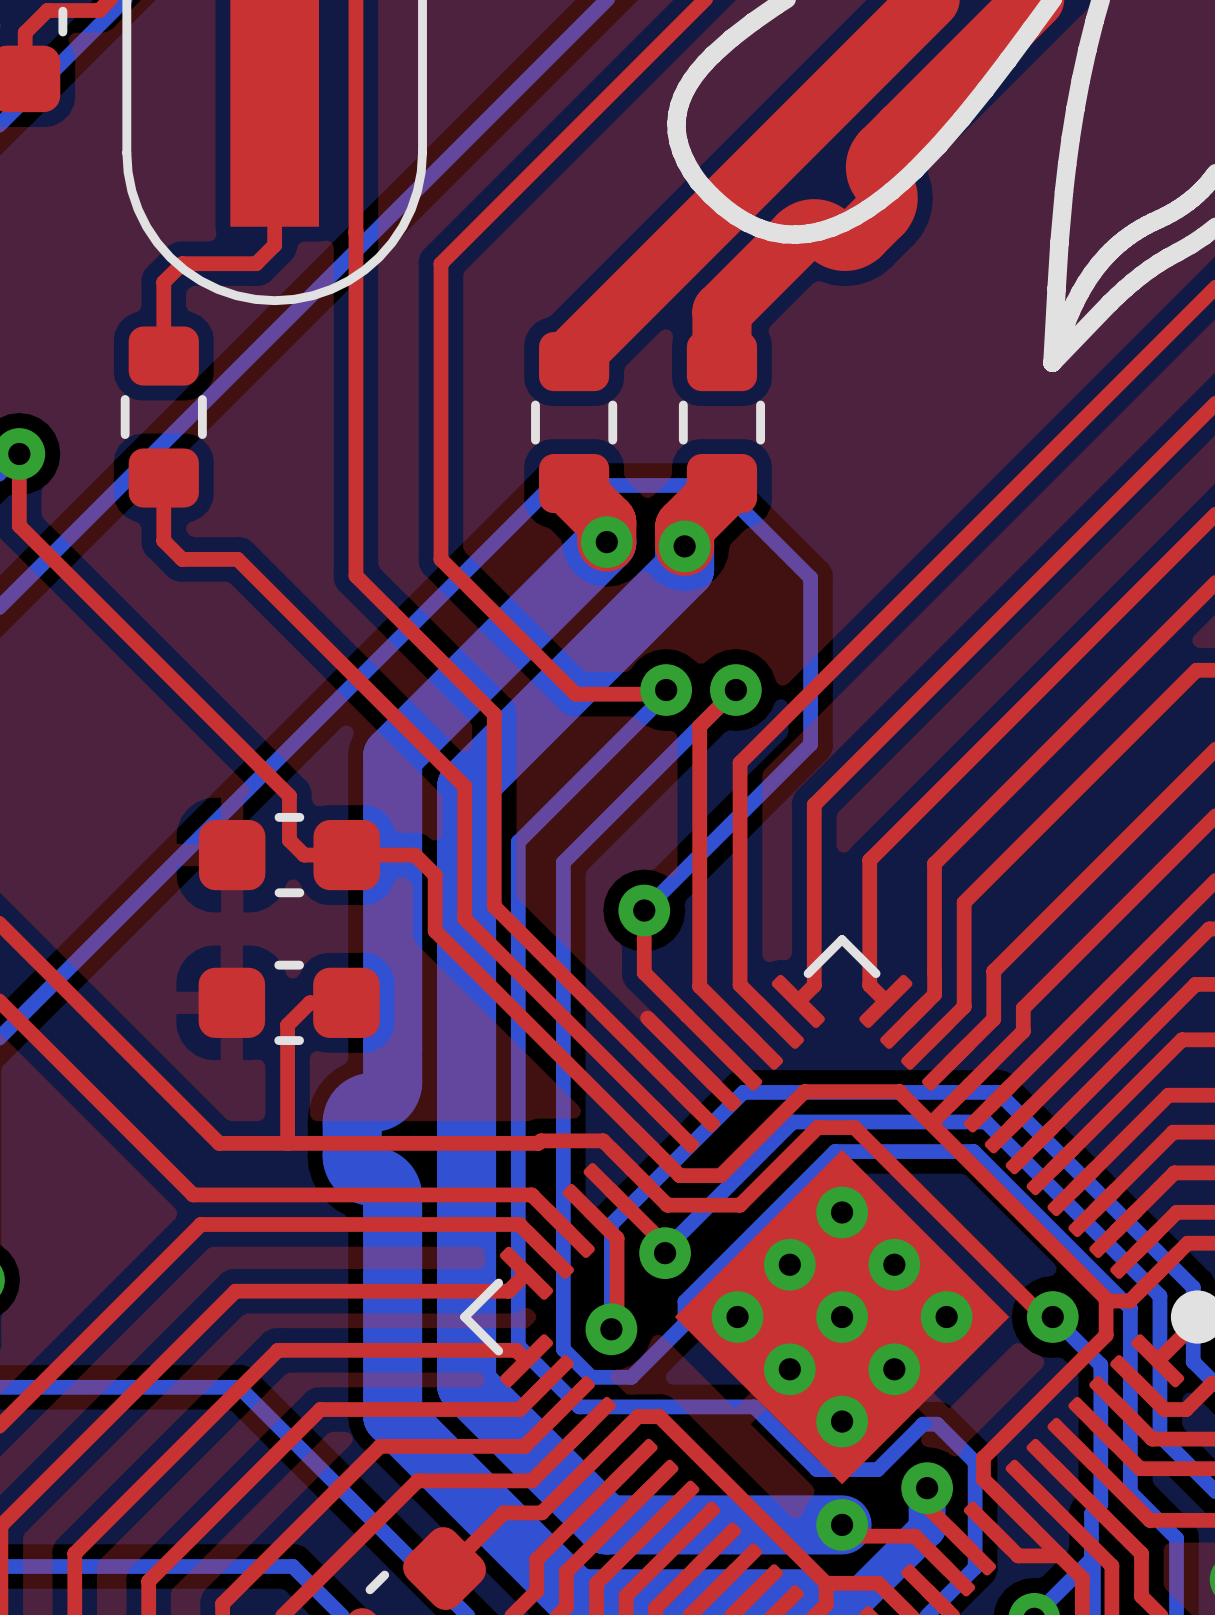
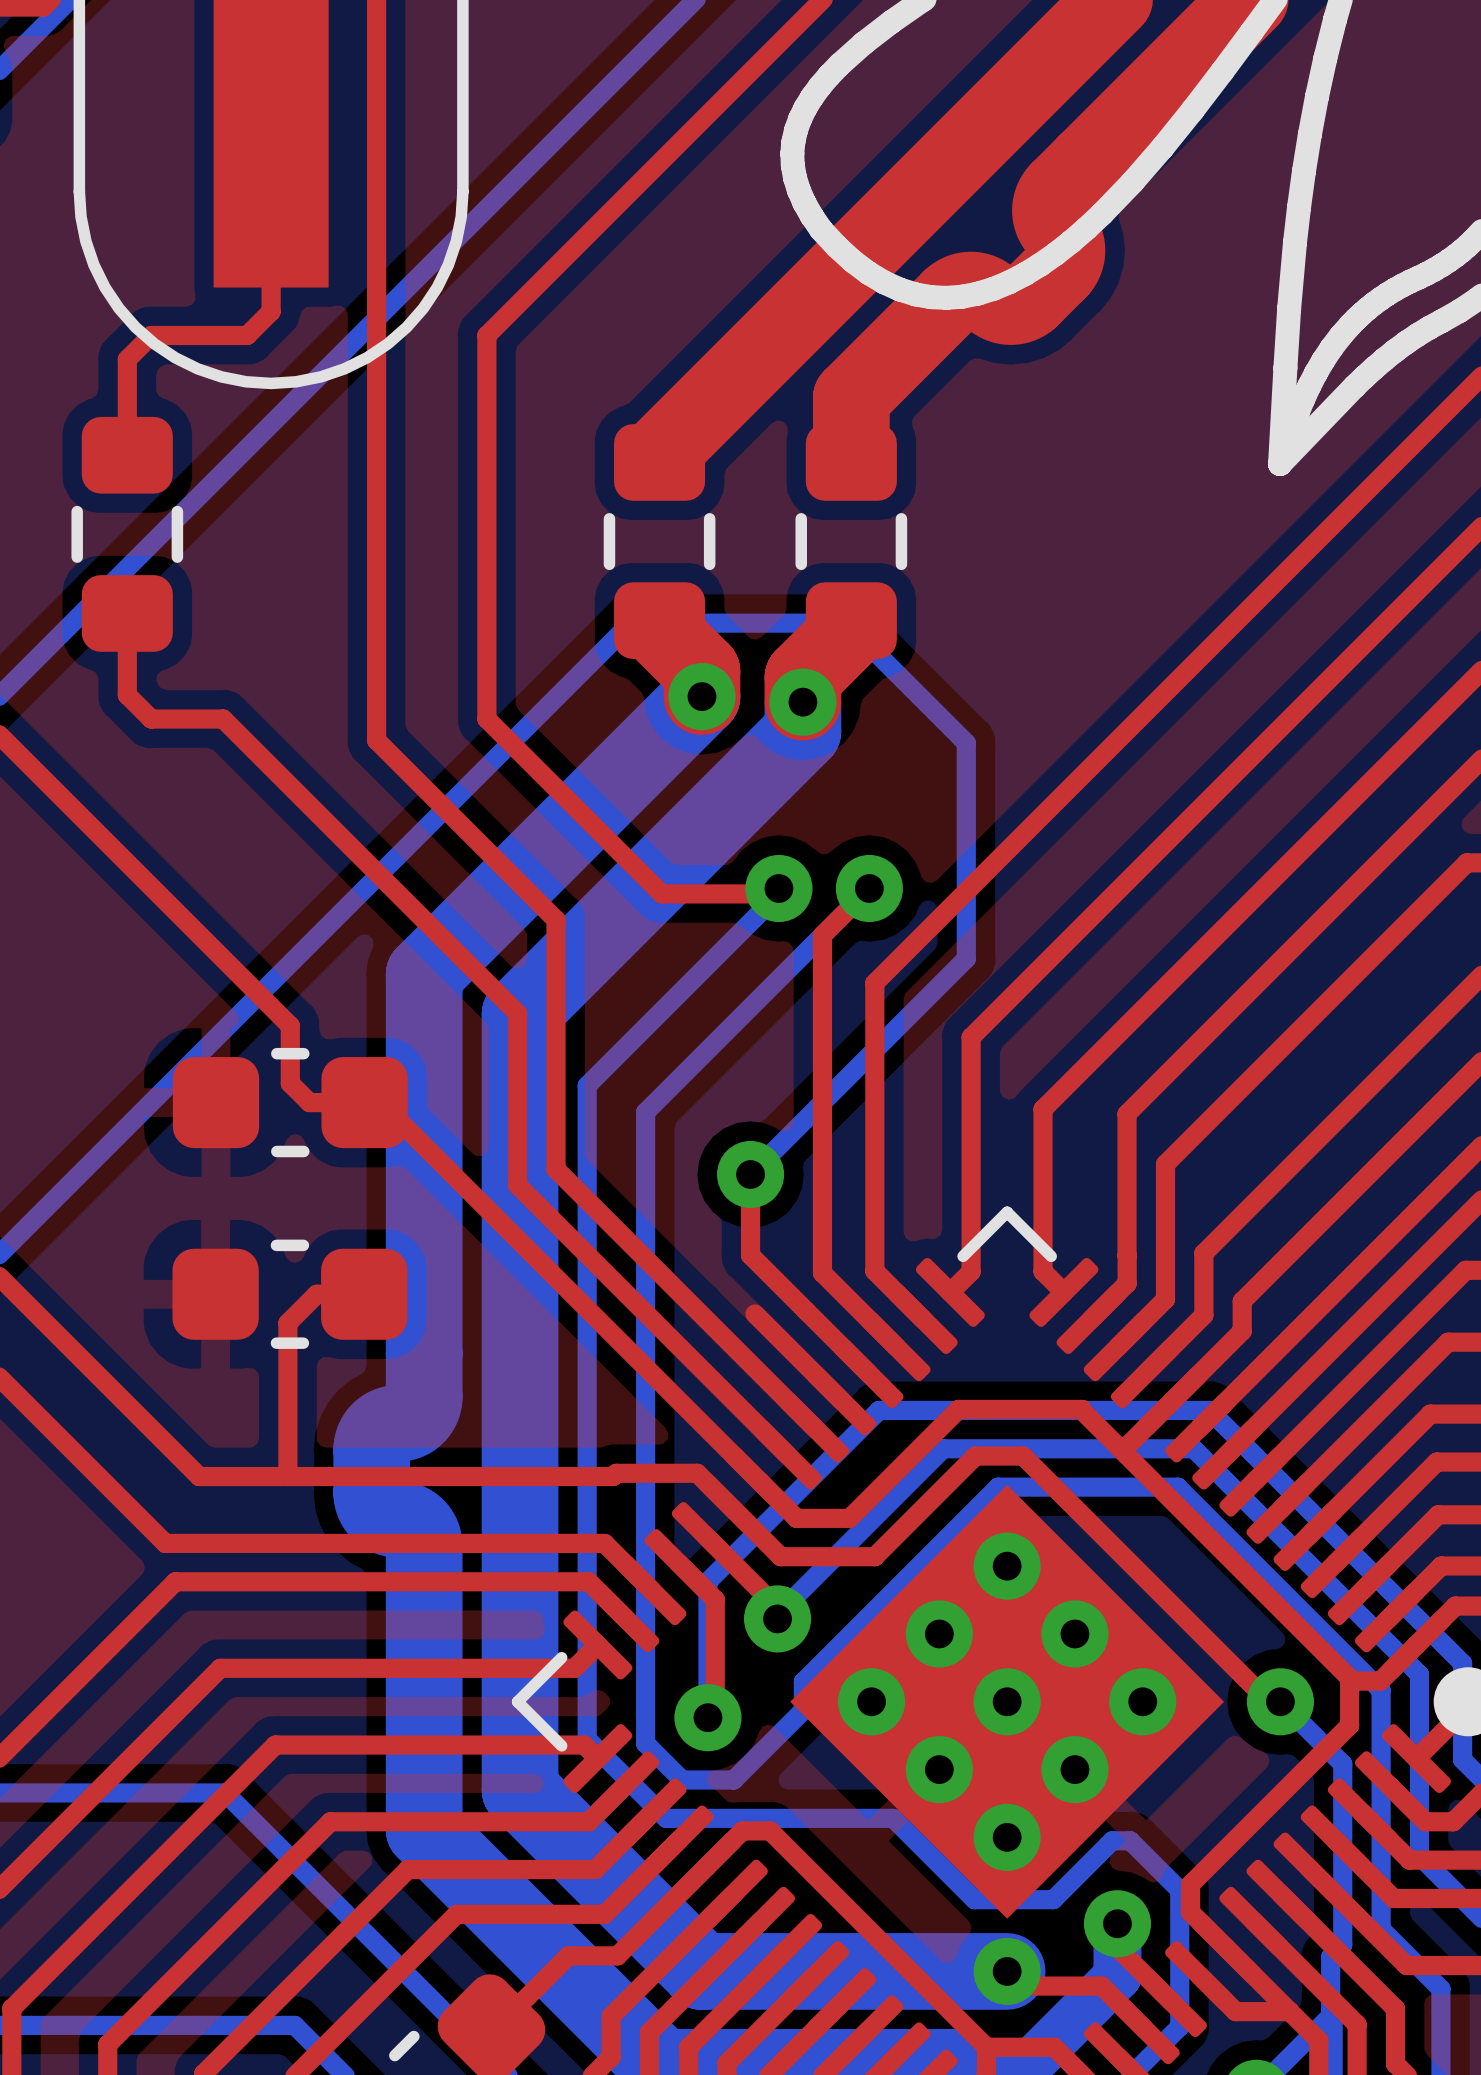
top track: (359, 855) (415, 855) (435, 875) (435, 930) -> (381, 1103) (479, 1201)

